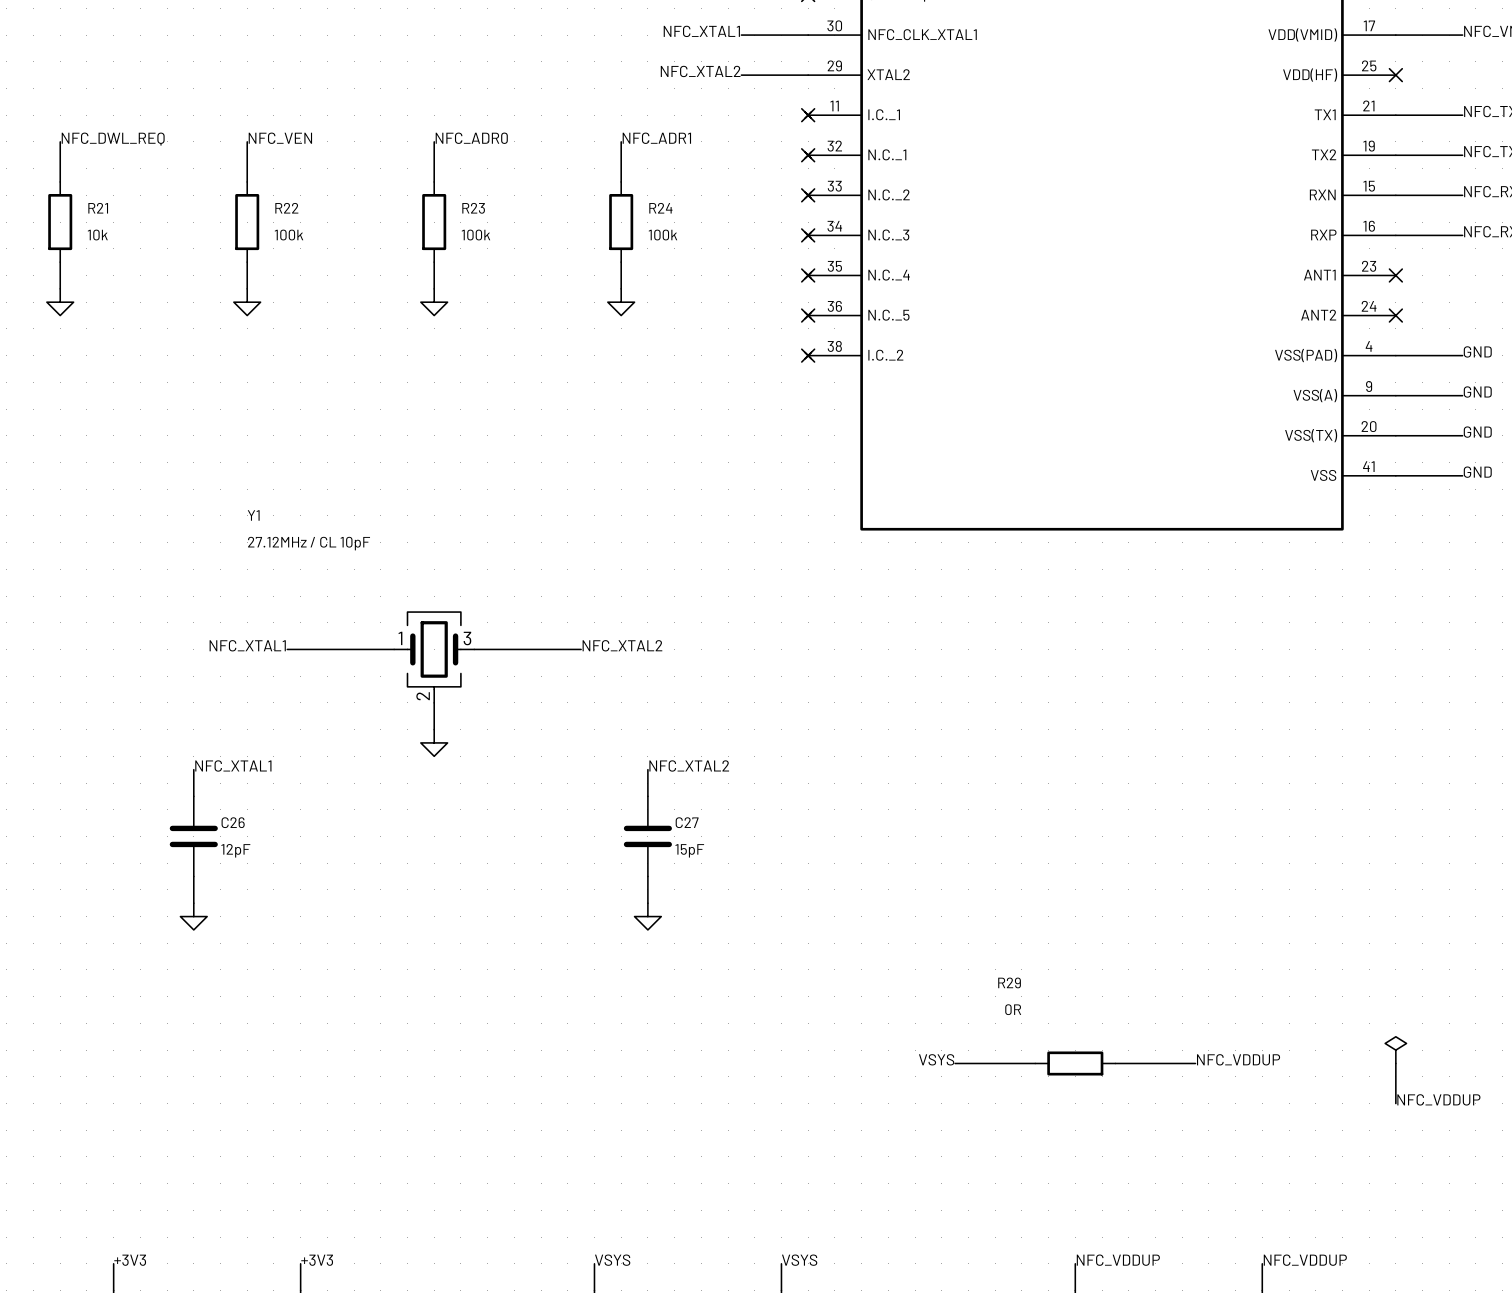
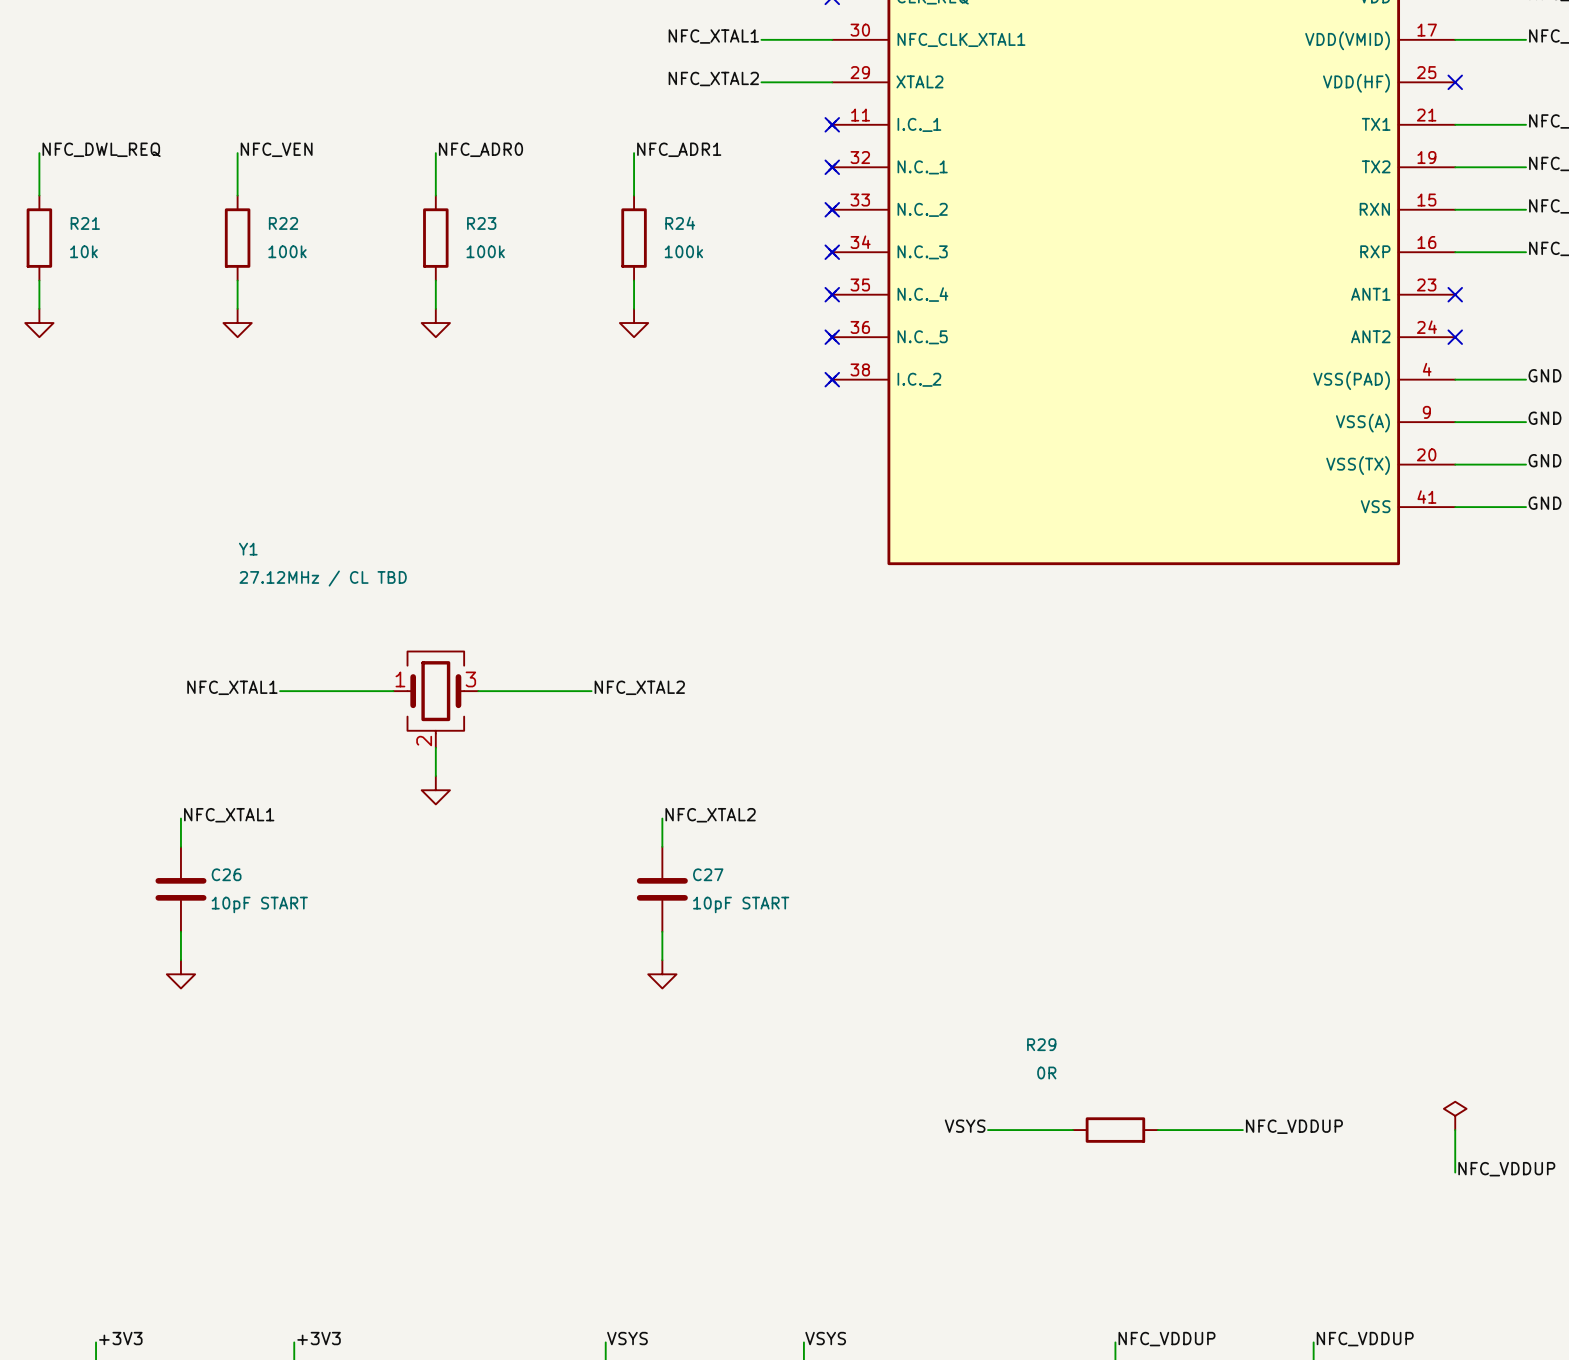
Y1 value: 27.12MHz / CL 10pF (309, 543) -> 27.12MHz / CL TBD (323, 578)
C26 value: 12pF (235, 850) -> 10pF START (259, 904)
C27 value: 15pF (689, 850) -> 10pF START (741, 904)

